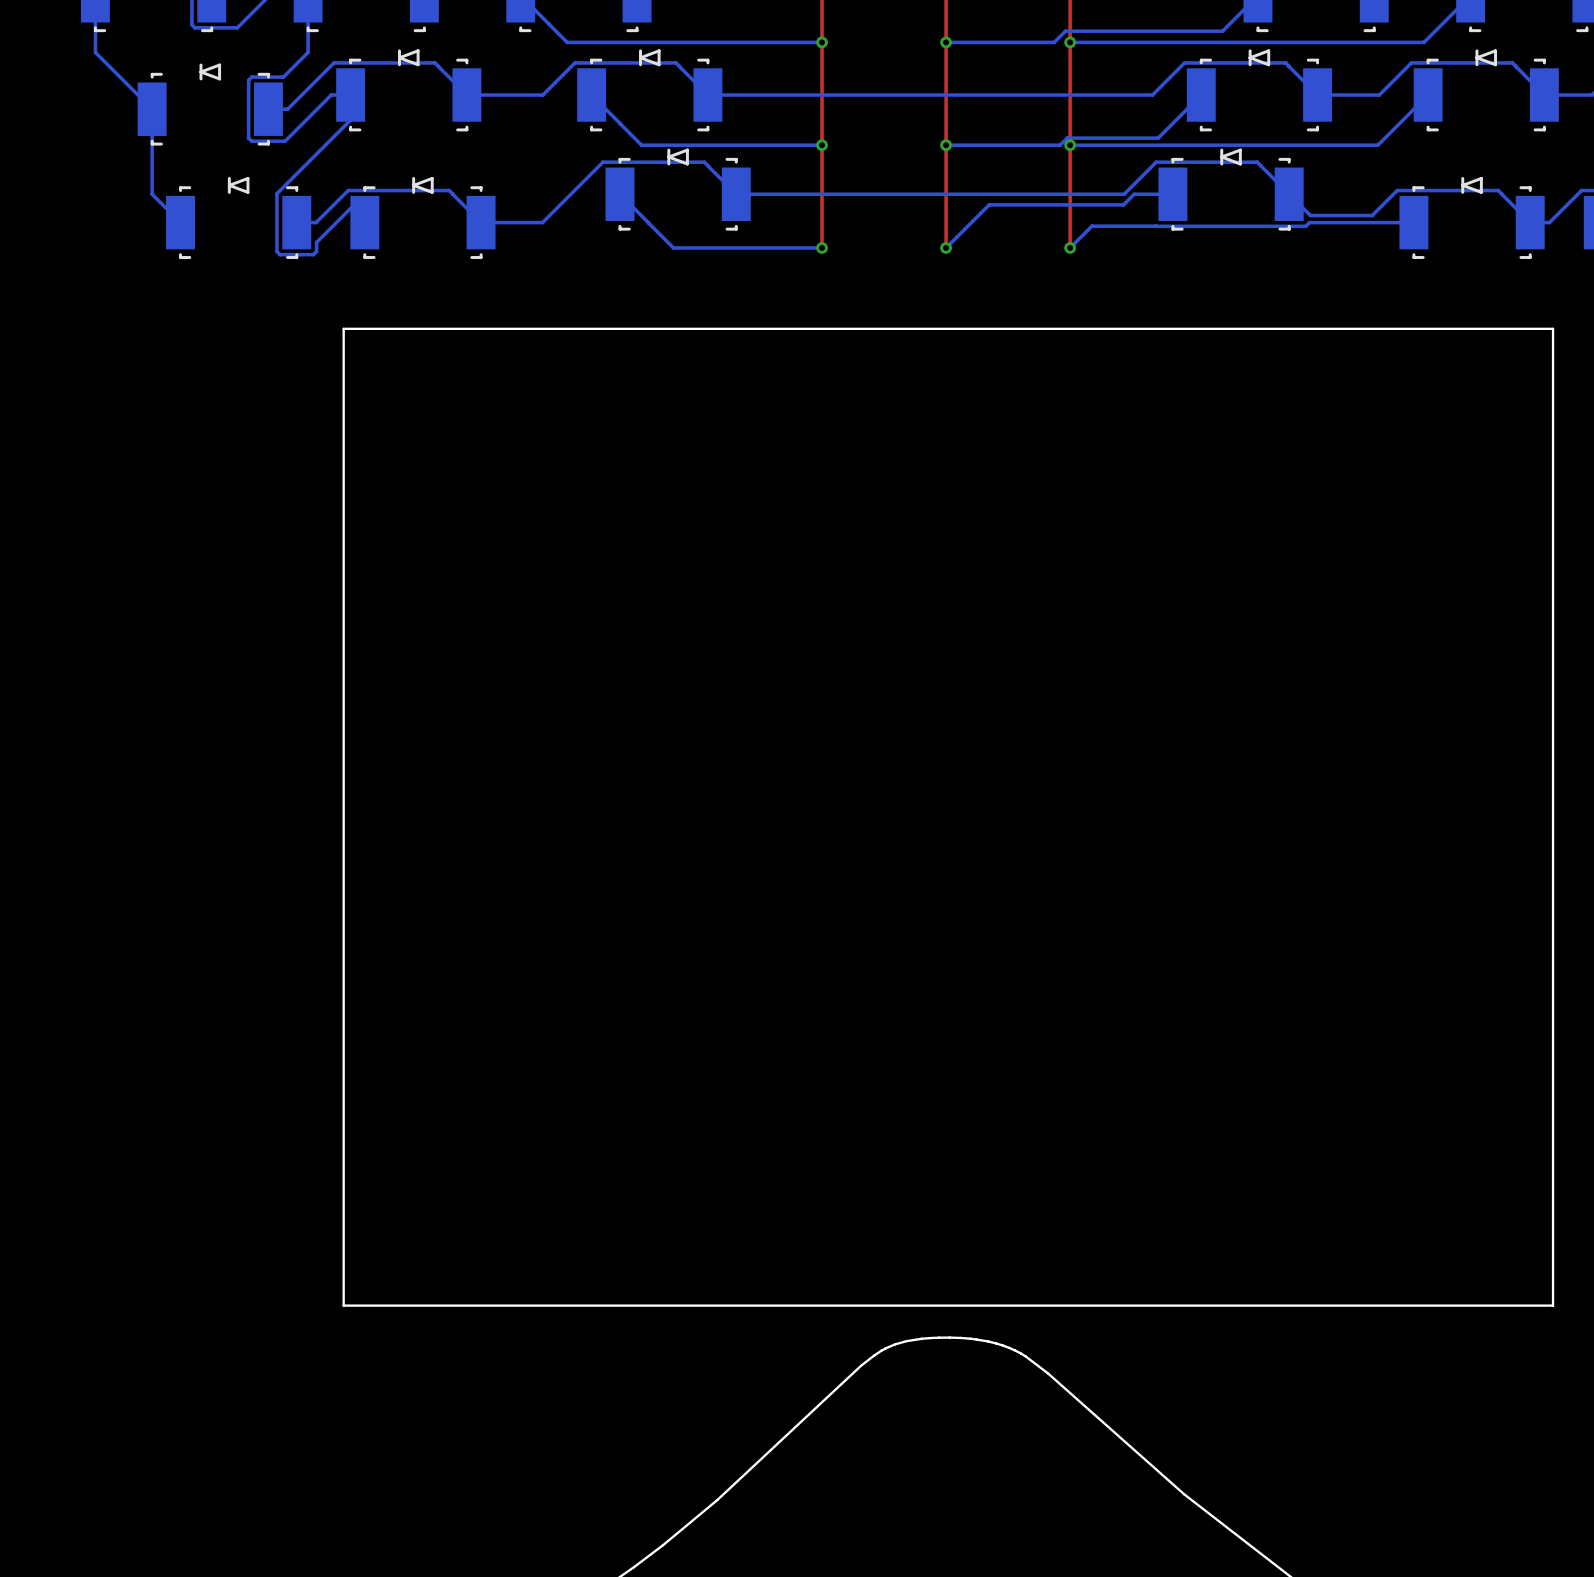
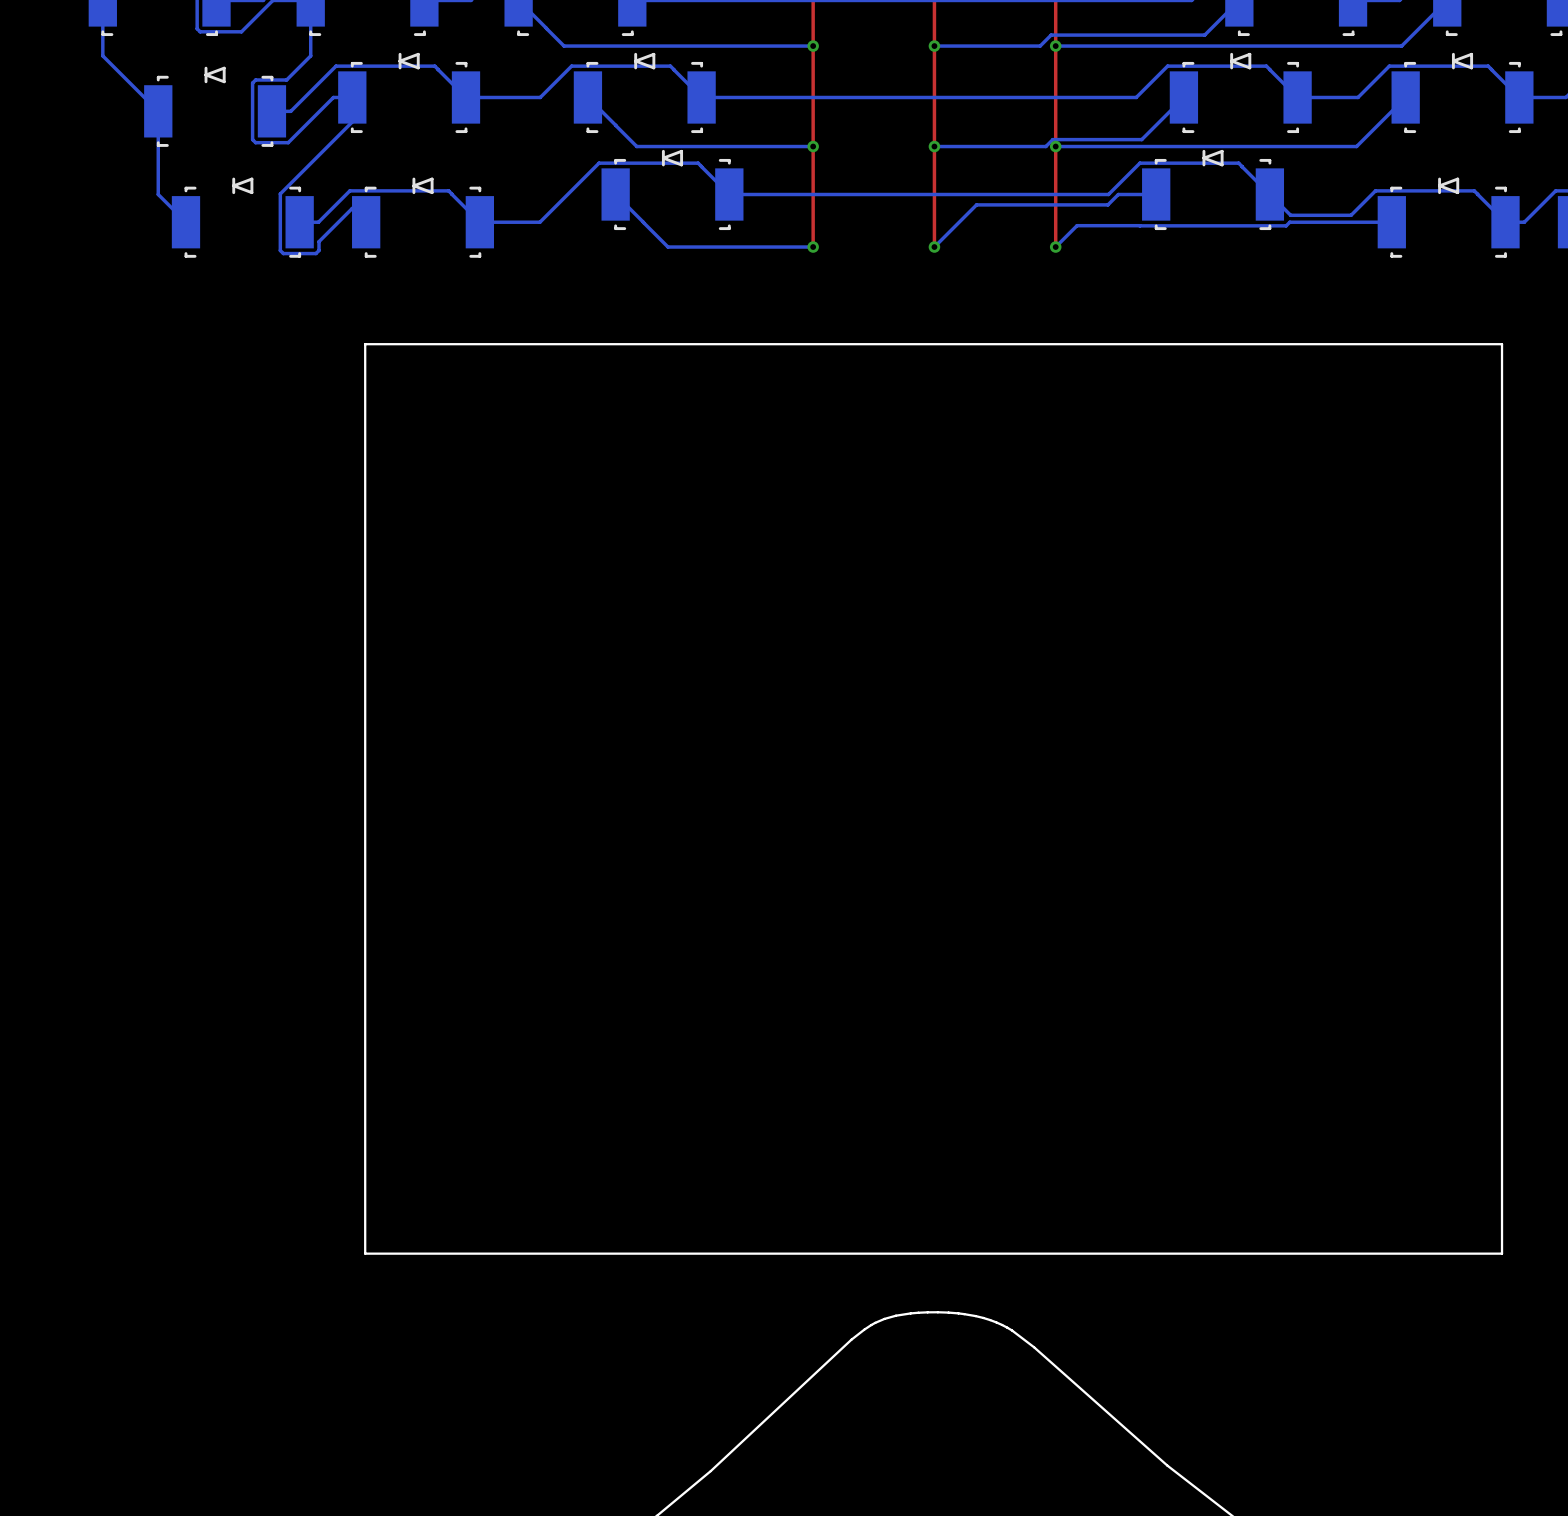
board edge: (1553, 328) (343, 328) (343, 1305) (1553, 1305) (1553, 328) -> (1502, 344) (1502, 1253) (365, 1253) (365, 344) (1502, 344)

